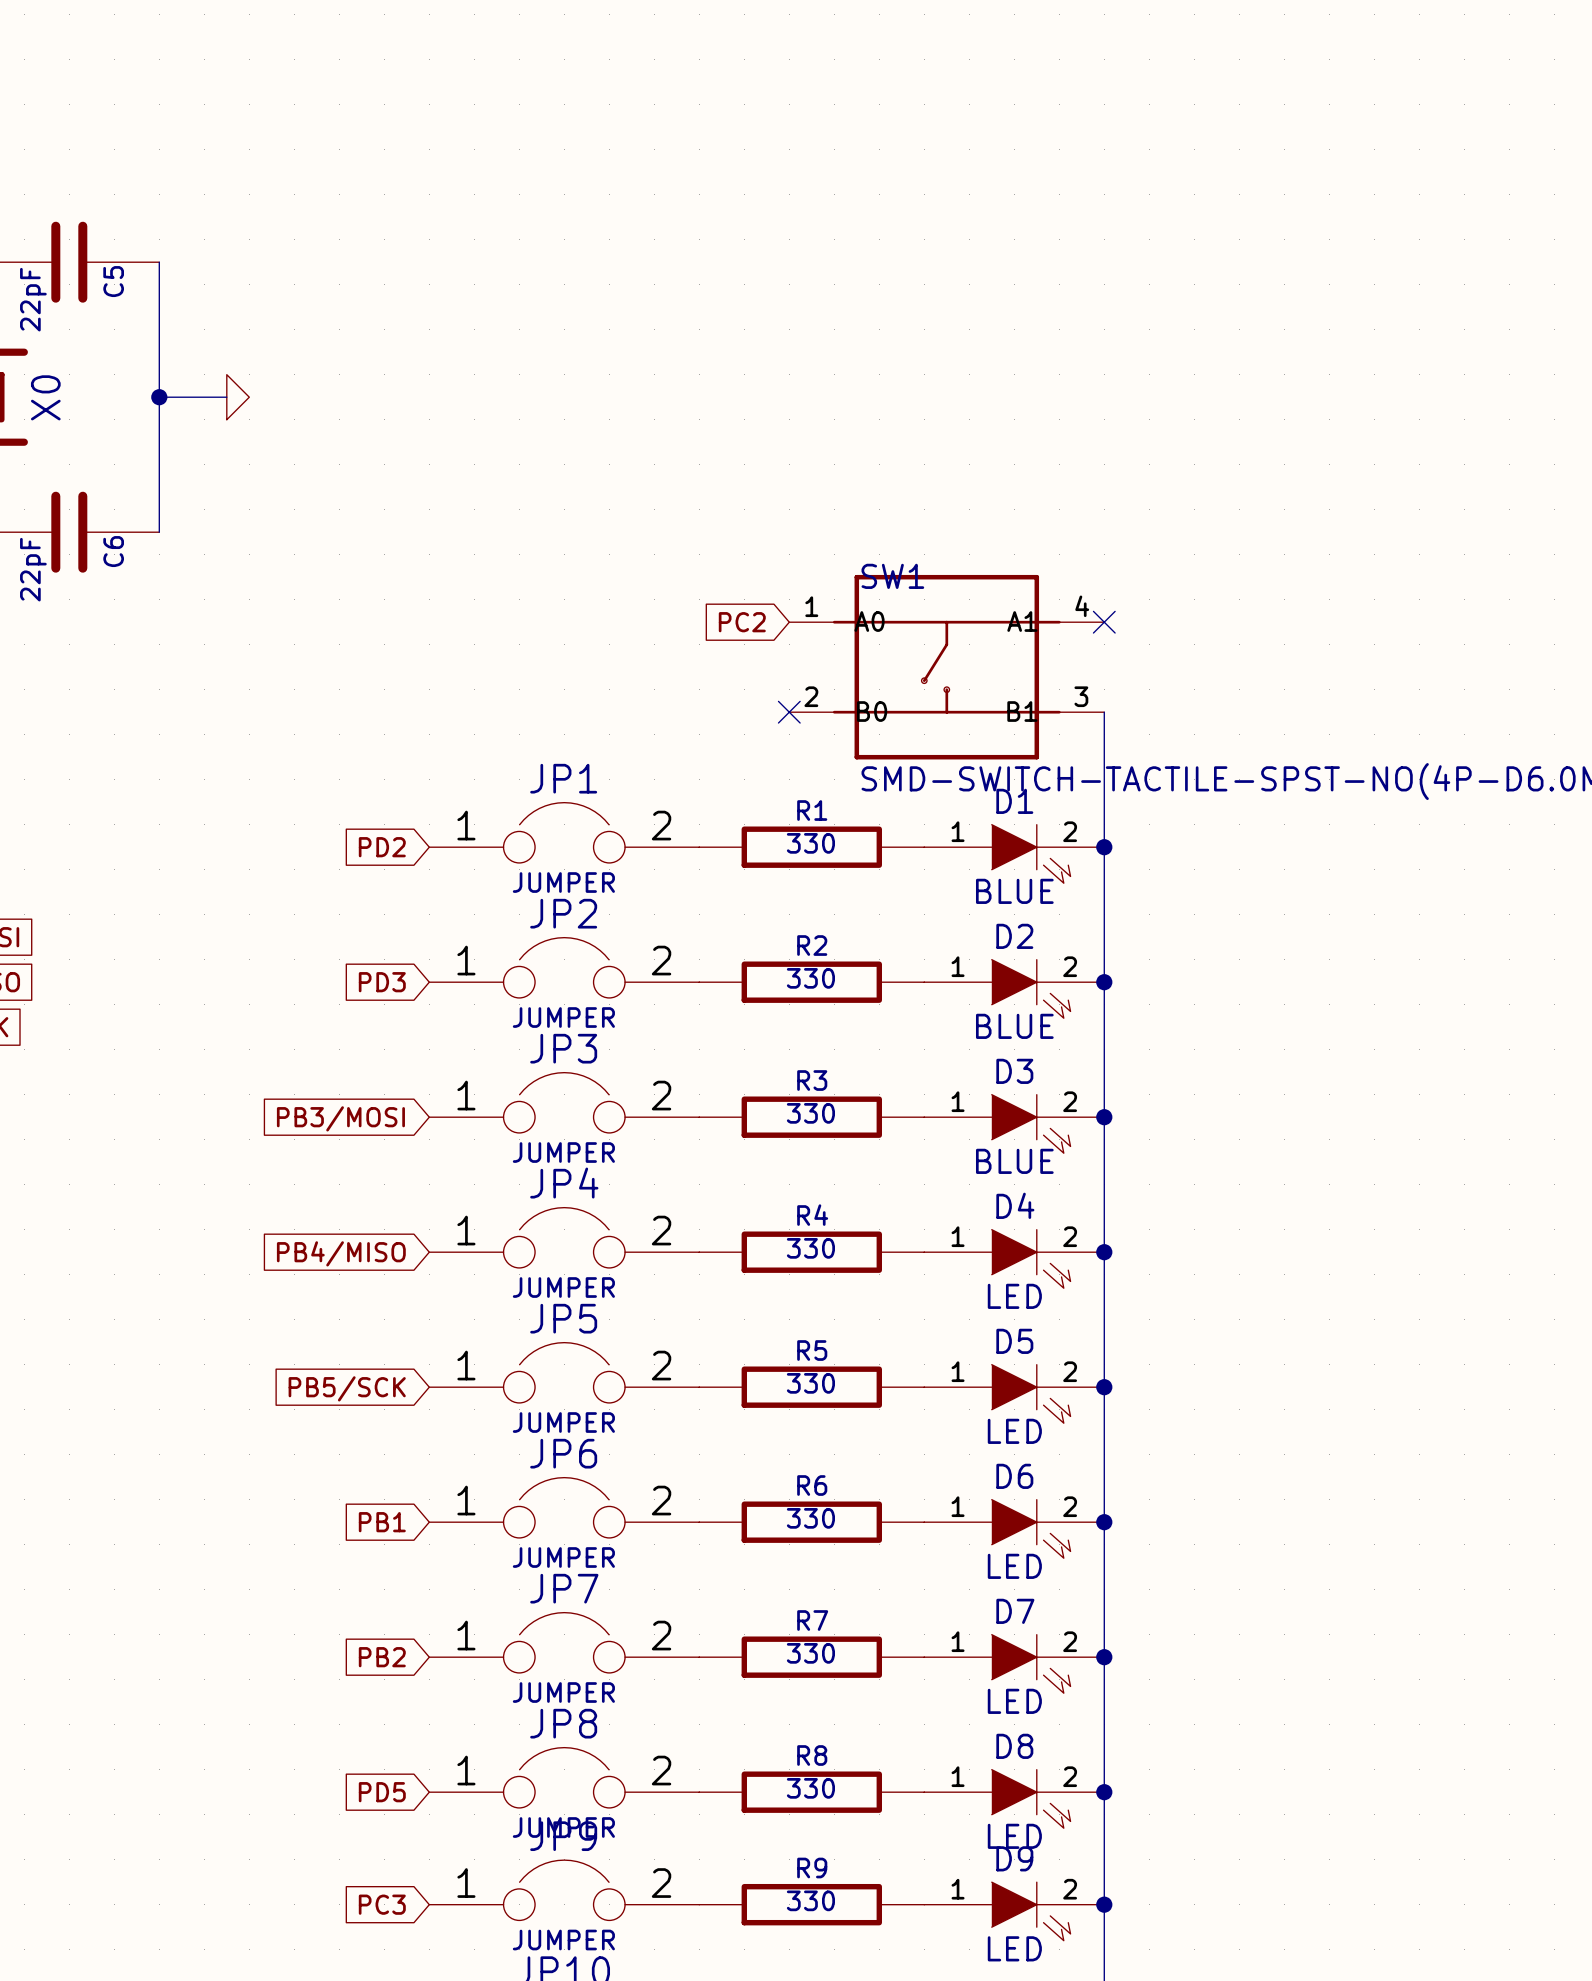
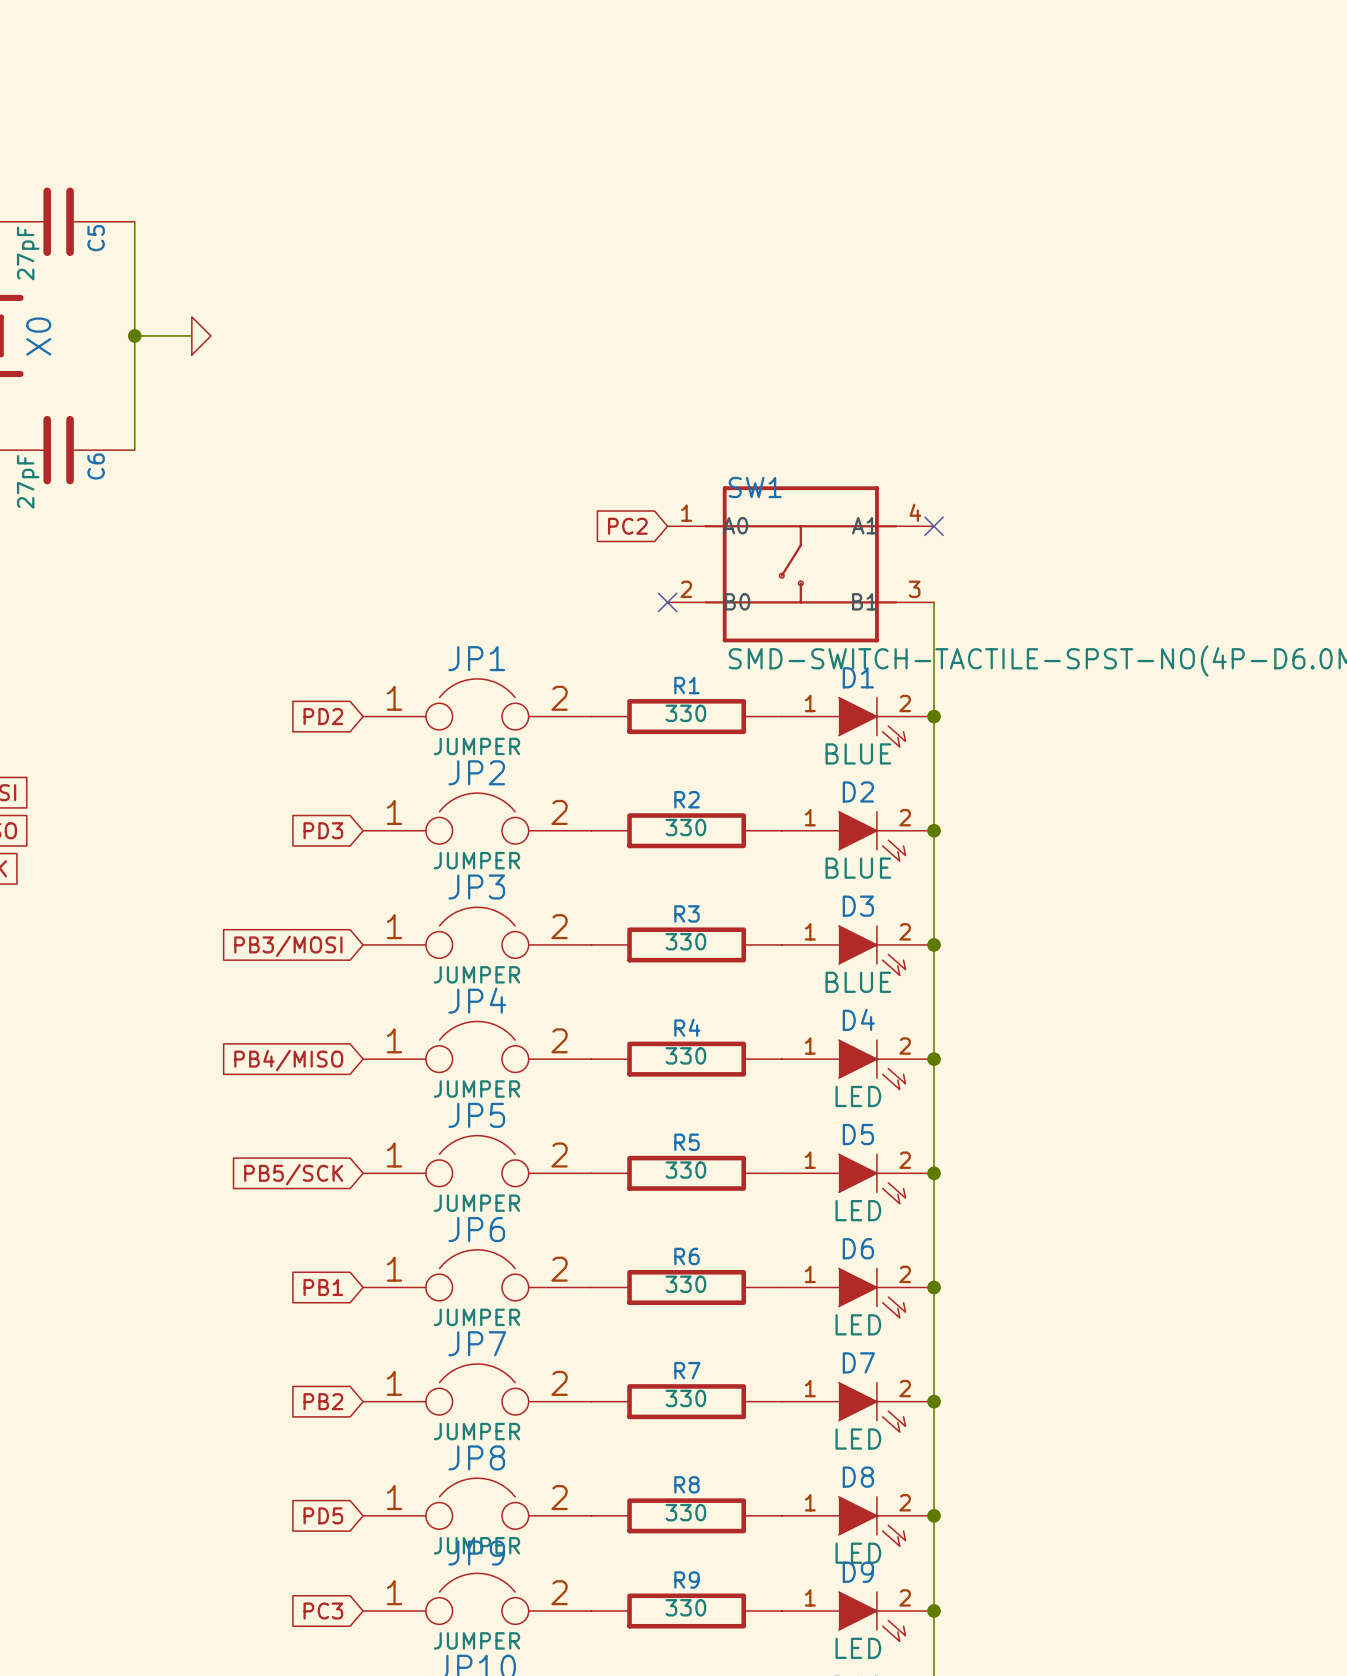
C5 value: 22pF (33, 299) -> 27pF (28, 253)
C6 value: 22pF (33, 569) -> 27pF (28, 481)

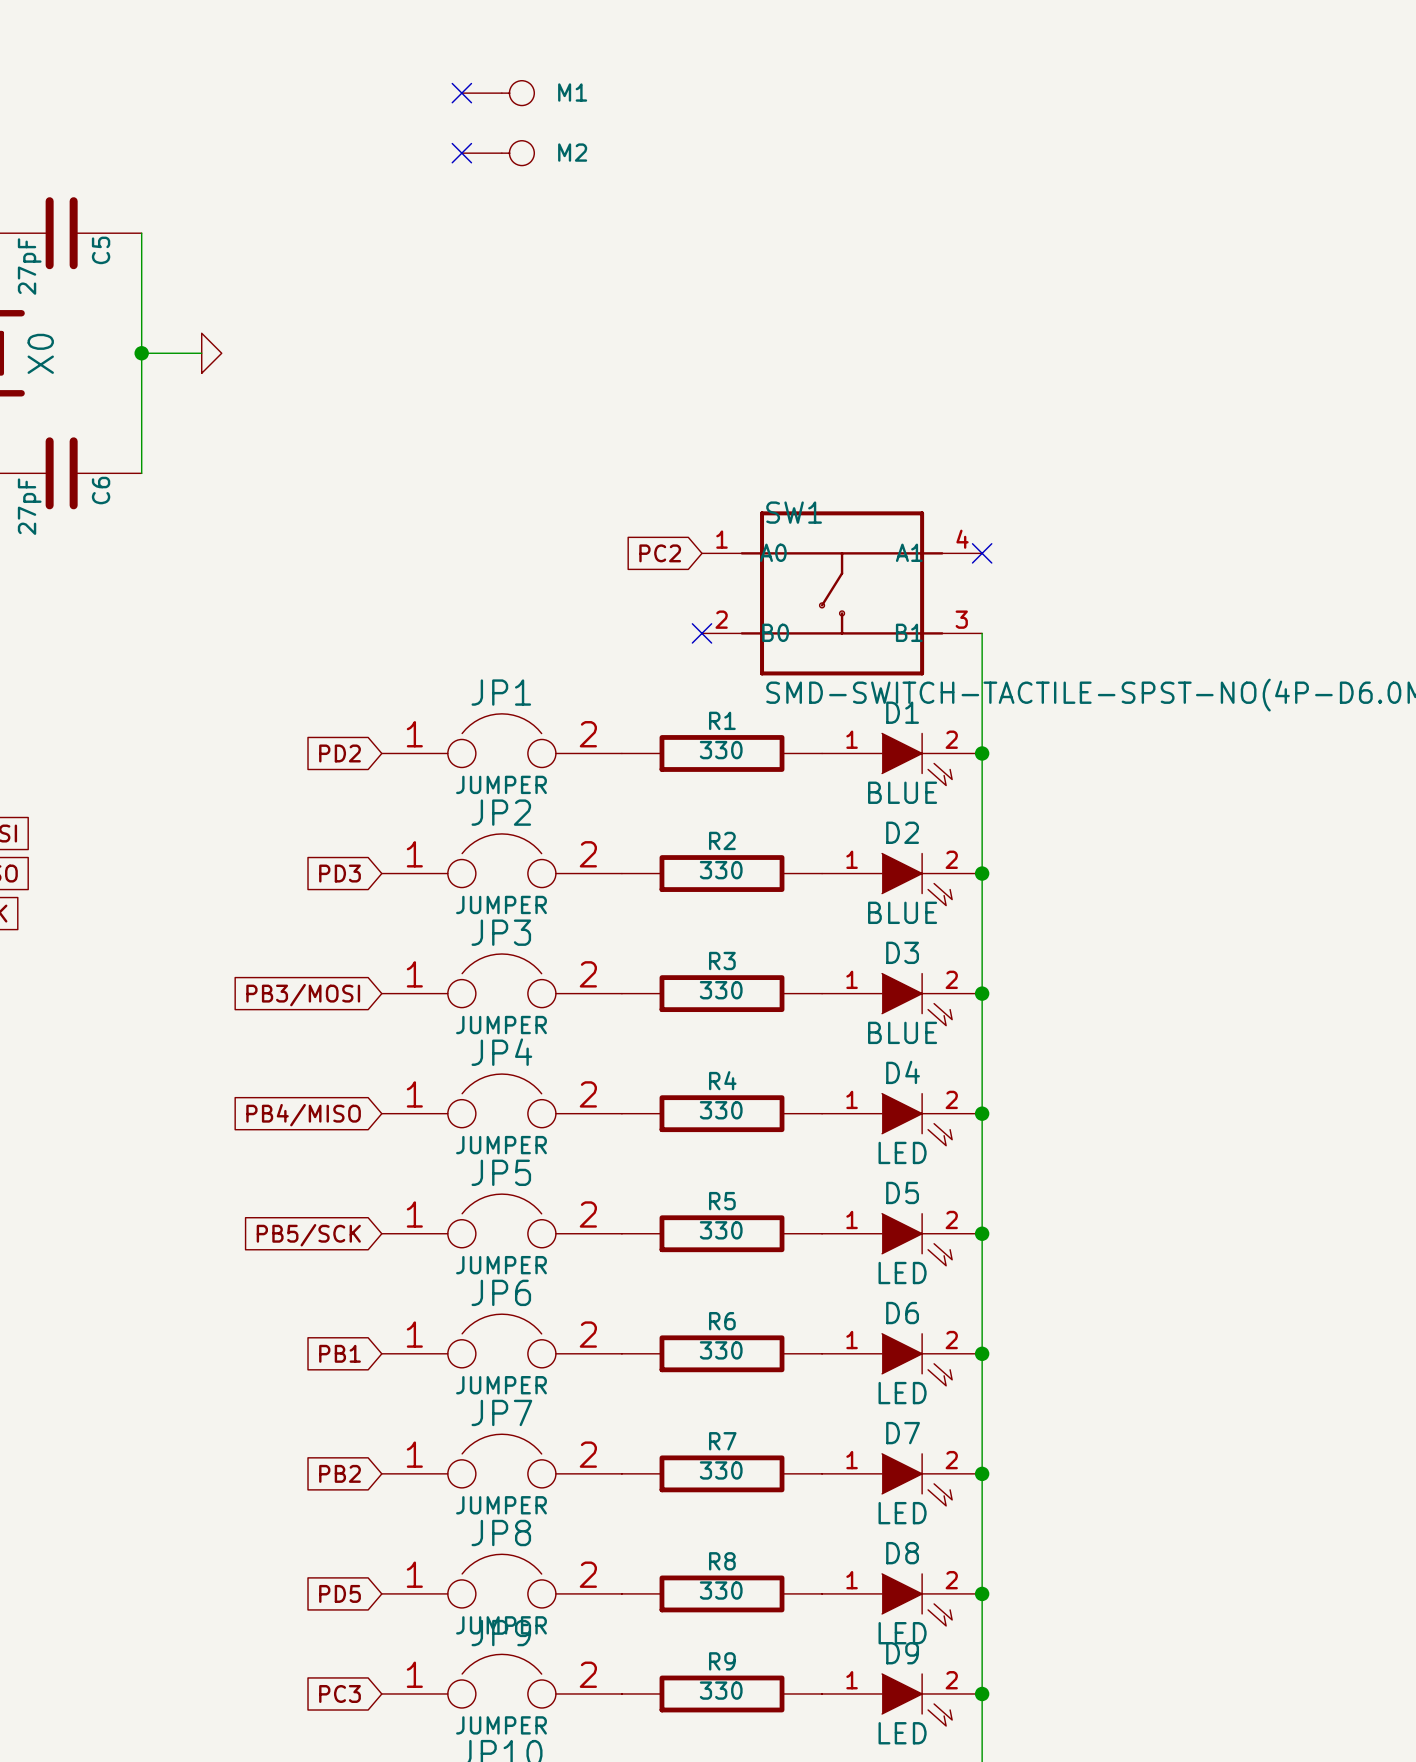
no-connect mark: none -> (461, 93)
M1: none -> (498, 93)
no-connect mark: none -> (461, 153)
M2: none -> (498, 153)

